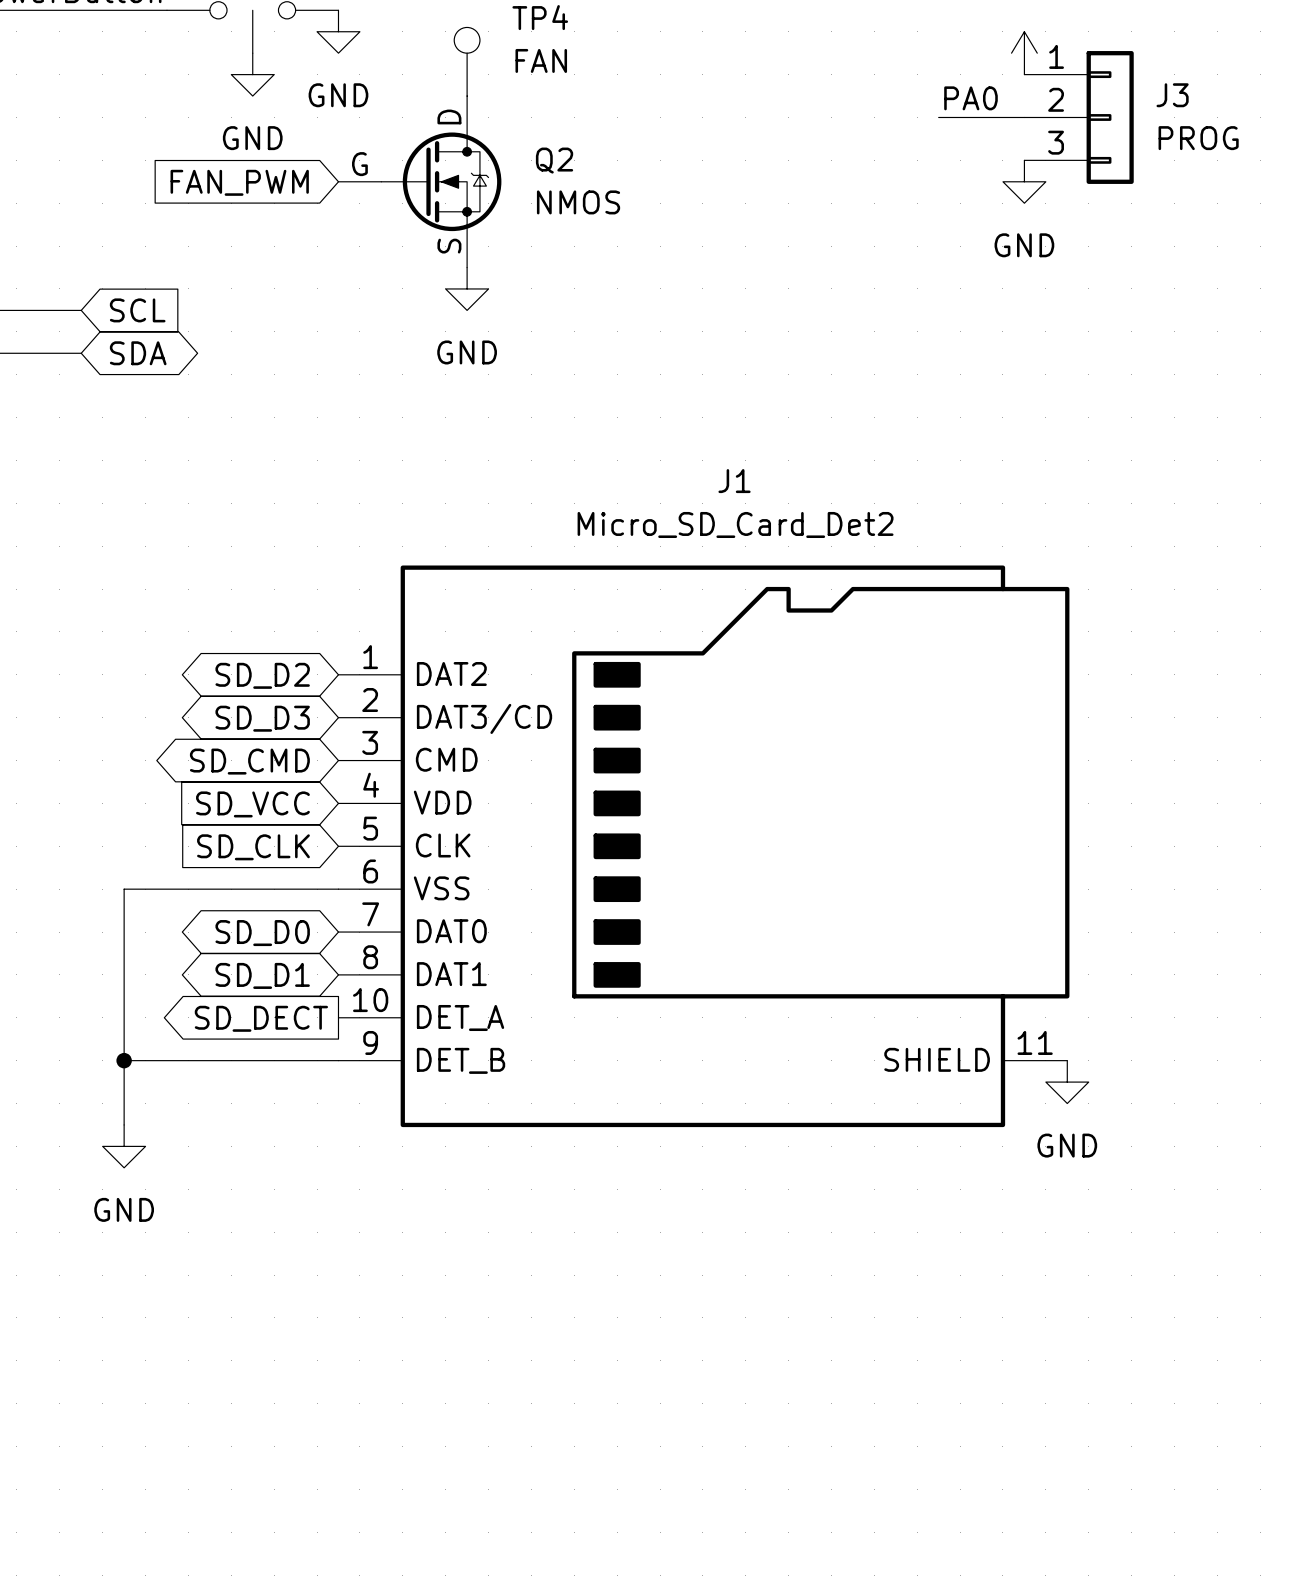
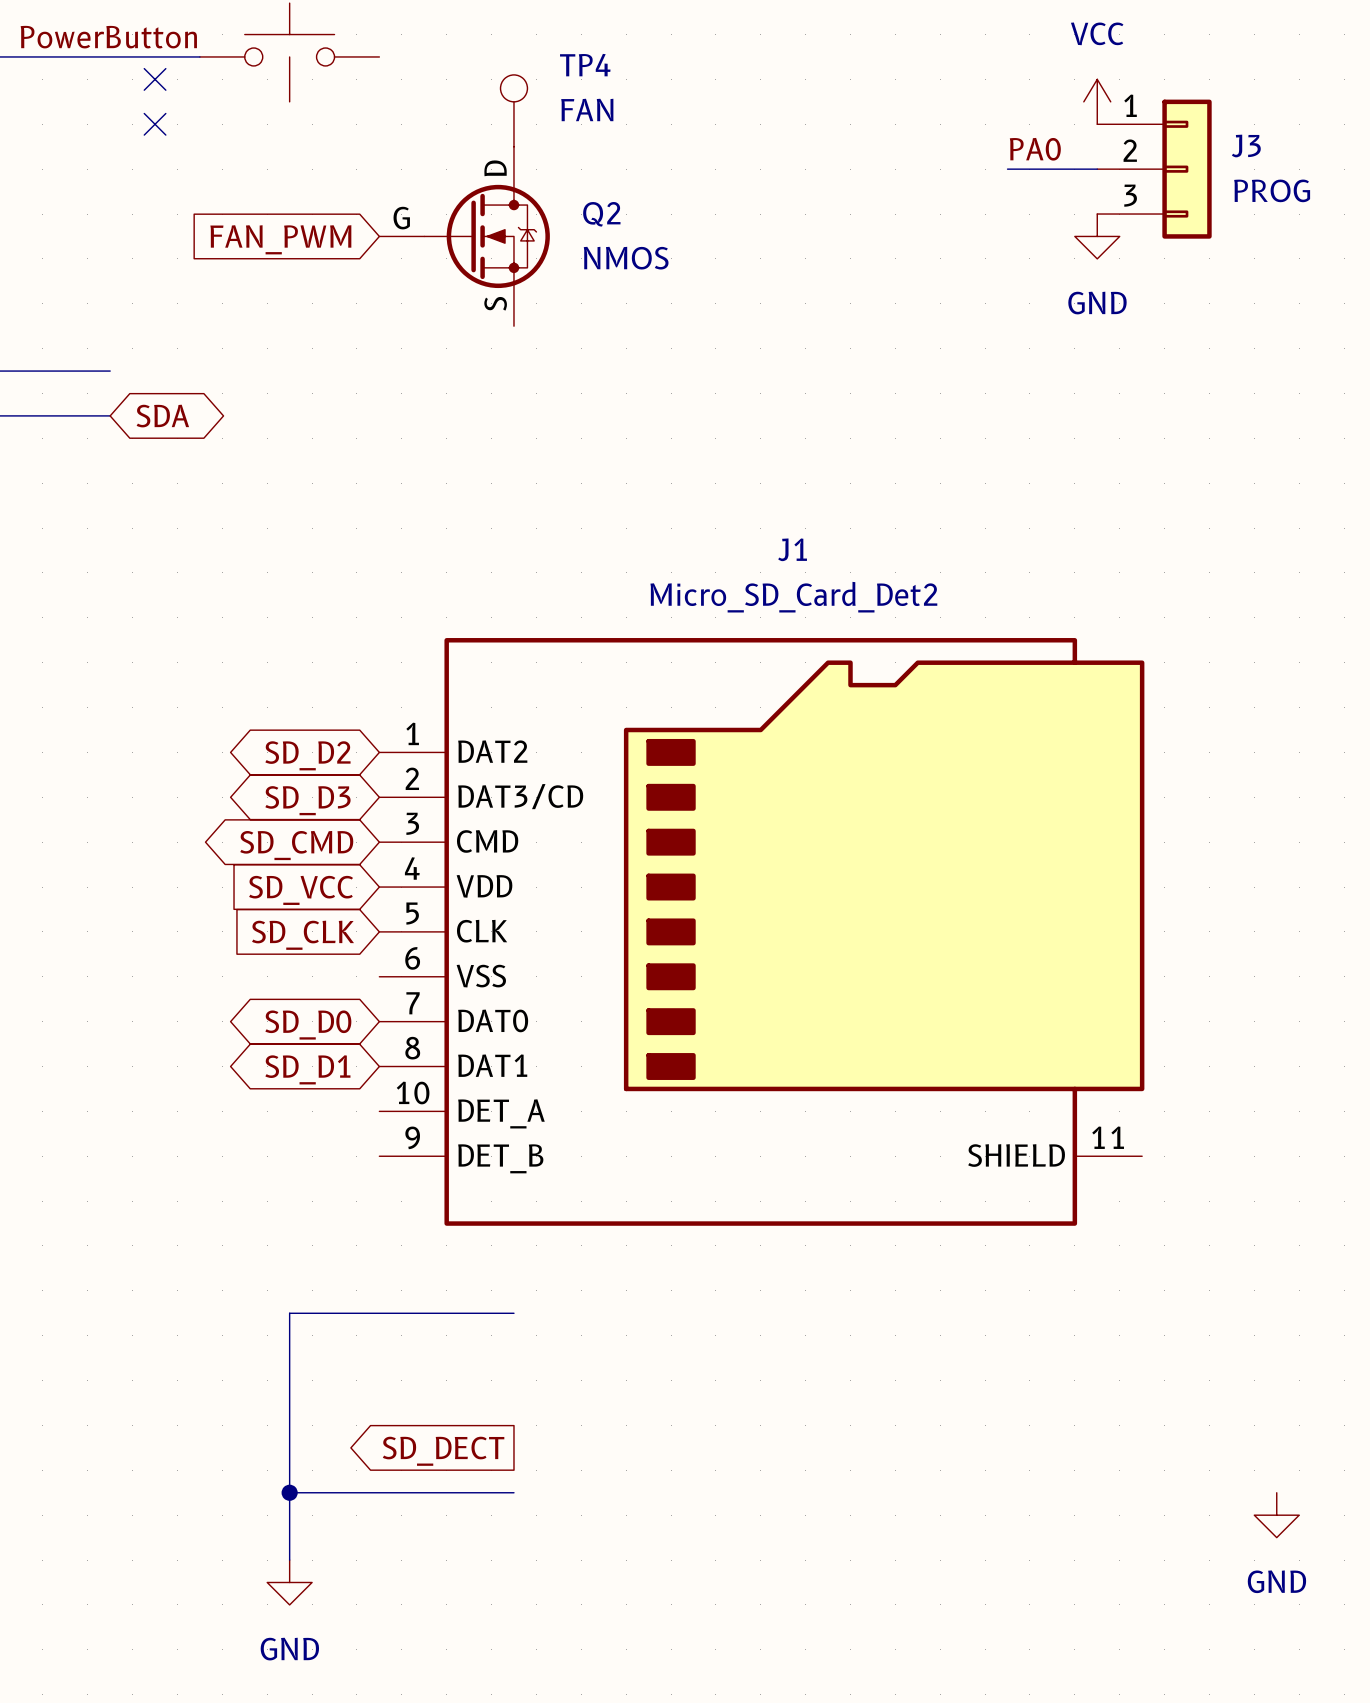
no-connect mark: none -> (155, 79)
power symbol: GND (338, 31) -> none
no-connect mark: none -> (155, 124)
power symbol: GND (252, 74) -> none
power symbol: GND (467, 288) -> none
global label: SCL (137, 310) -> none
wire: (338, 889) (124, 889) (124, 1124) -> (513, 1313) (289, 1313) (289, 1560)
global label position: SD_DECT (261, 1018) -> SD_DECT (443, 1451)
wire: (124, 1060) (338, 1060) -> (289, 1492) (513, 1492)
junction: (124, 1060) -> none
power symbol position: GND (1067, 1082) -> GND (1276, 1515)
power symbol position: GND (124, 1146) -> GND (289, 1582)
junction: none -> (289, 1492)

